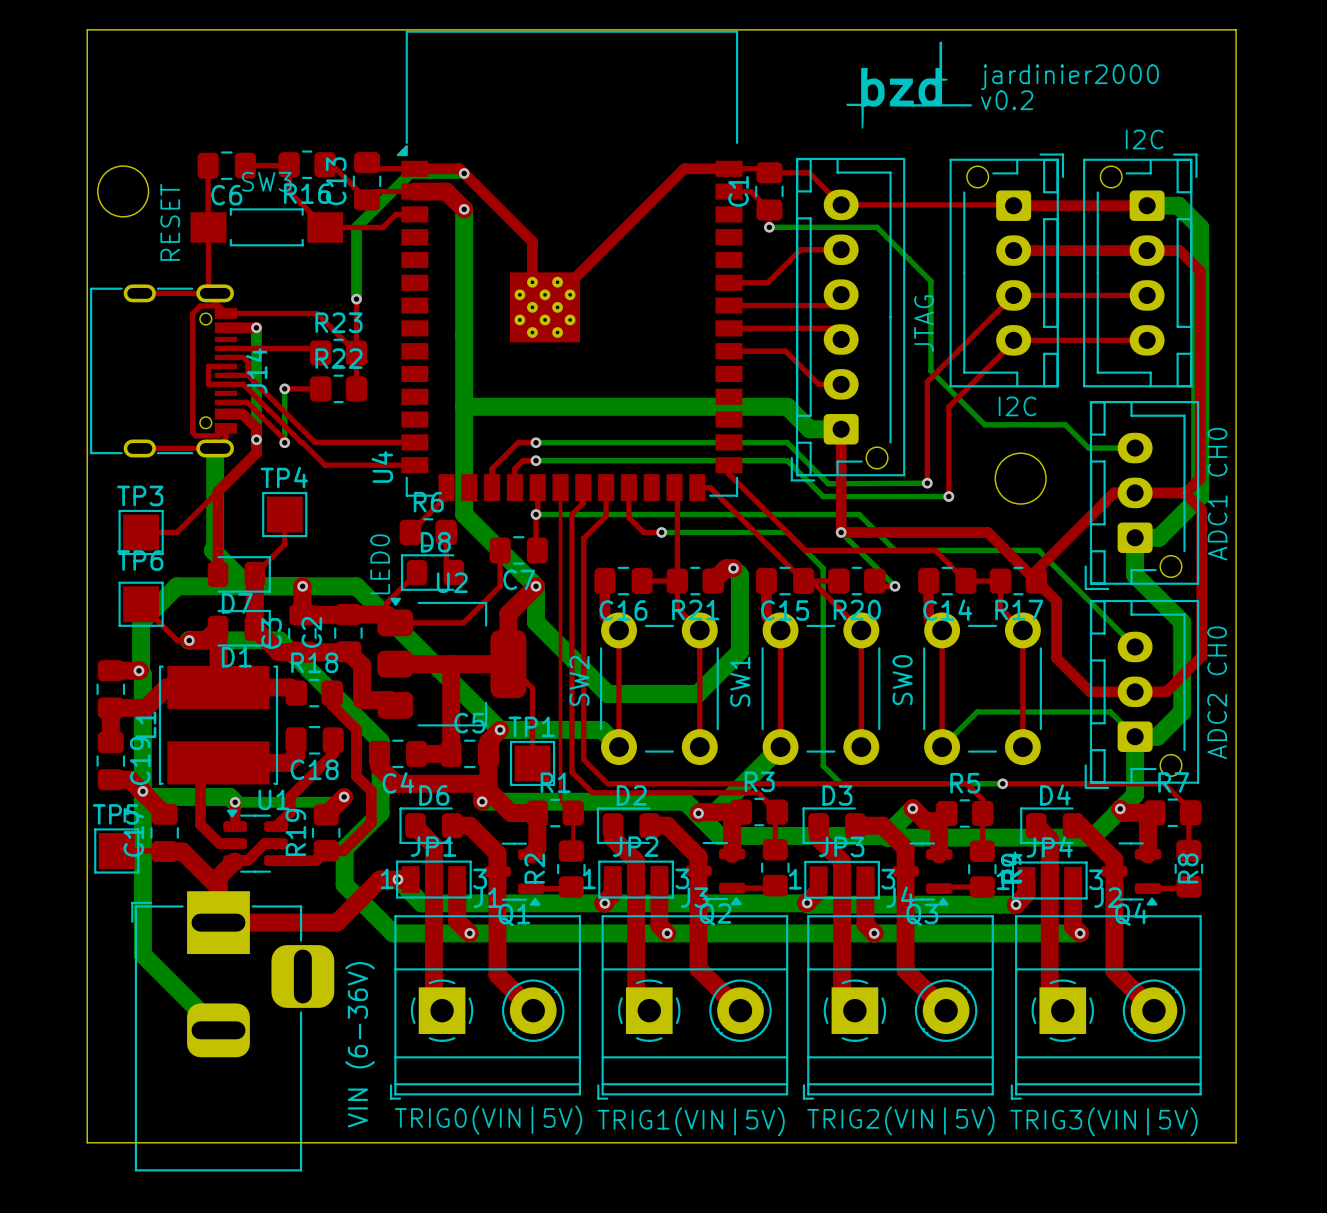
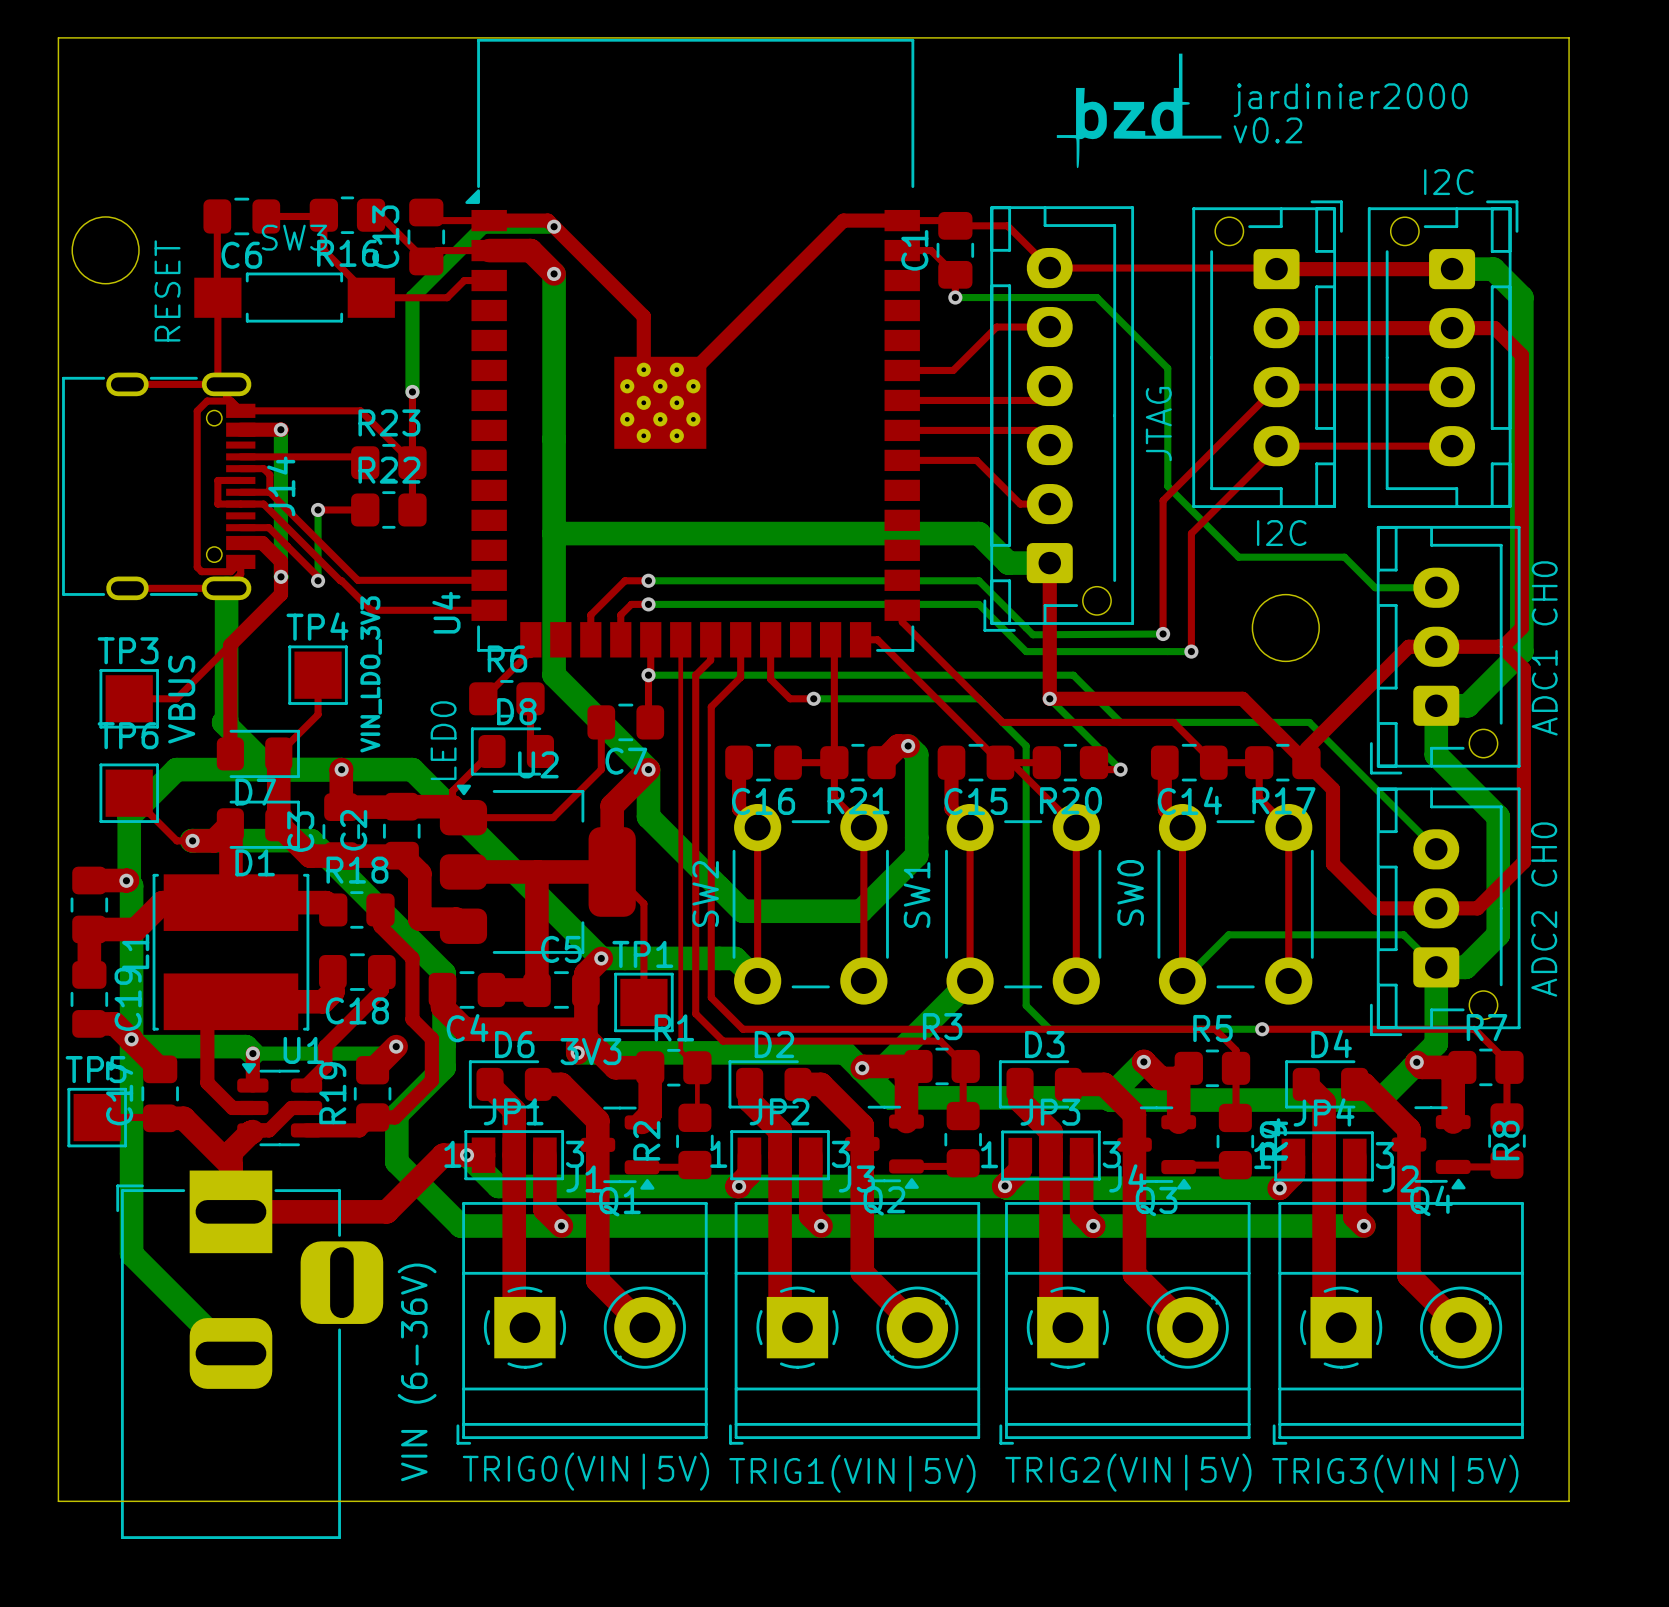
TP4 value: none -> VIN_LDO_3V3 (371, 674)
TP3 value: none -> VBUS (181, 699)
TP1 value: none -> 3V3 (590, 1051)

